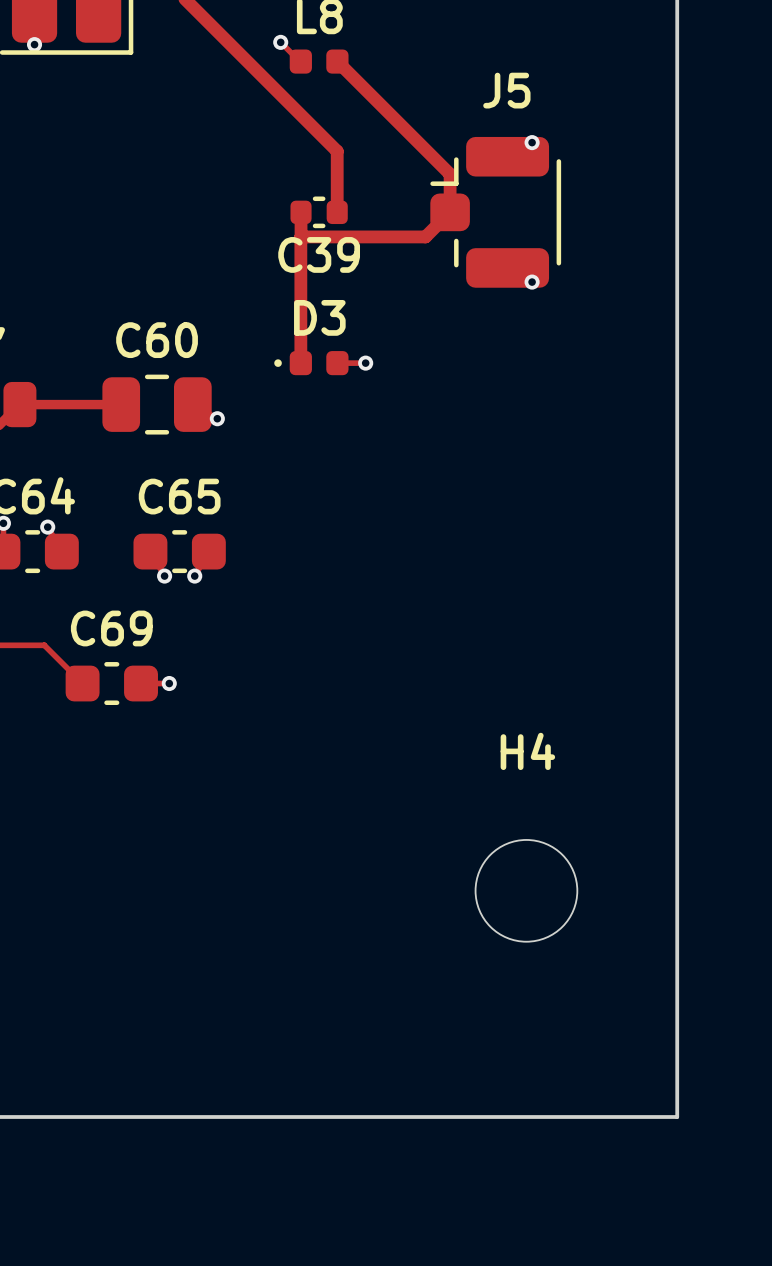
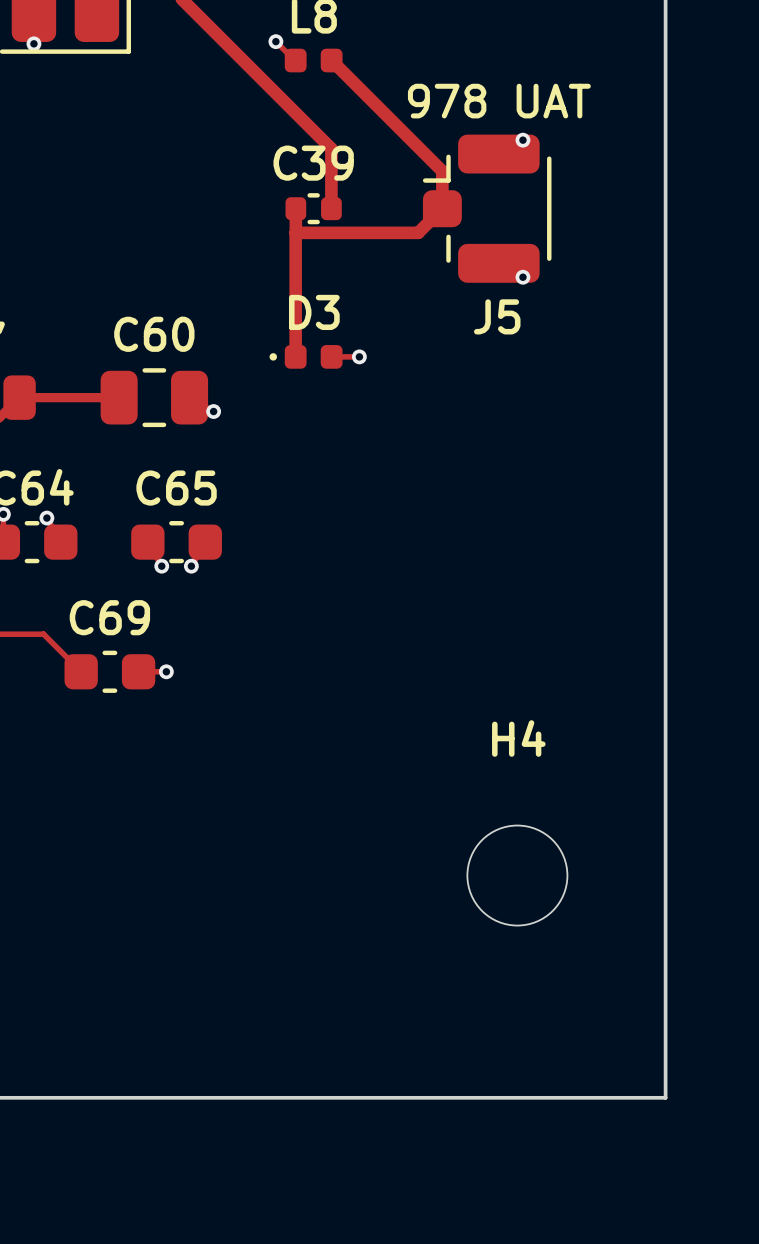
J5 name position: J5 (506, 90) -> J5 (497, 316)
text: none -> 978 UAT (499, 101)
C39 name position: C39 (319, 254) -> C39 (313, 163)

